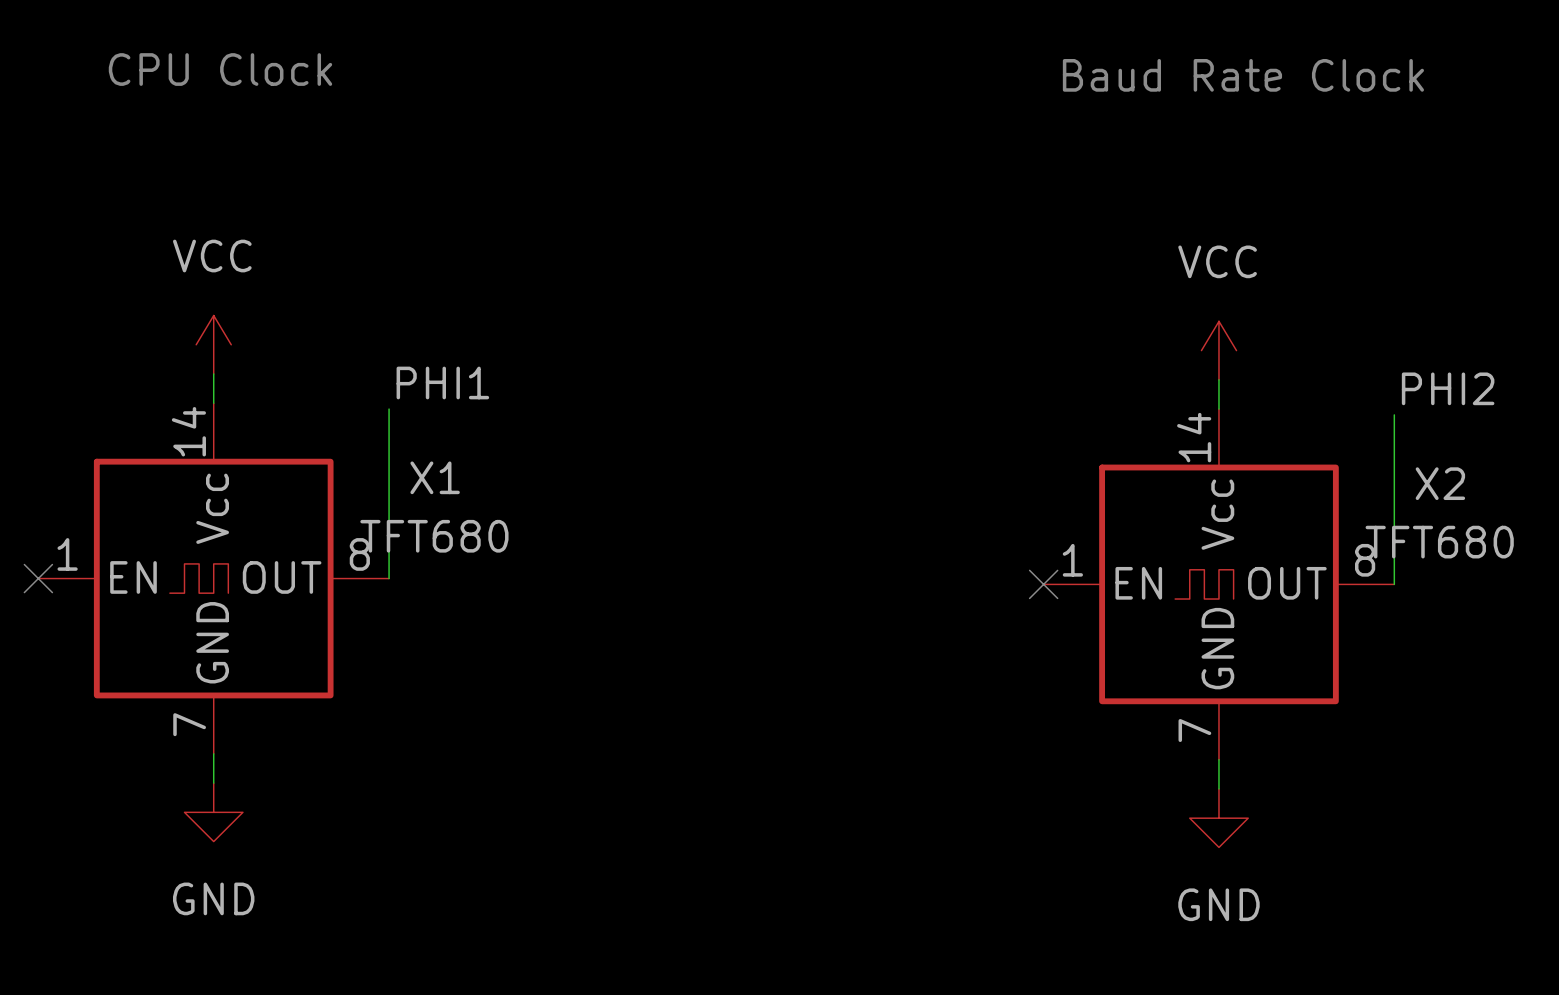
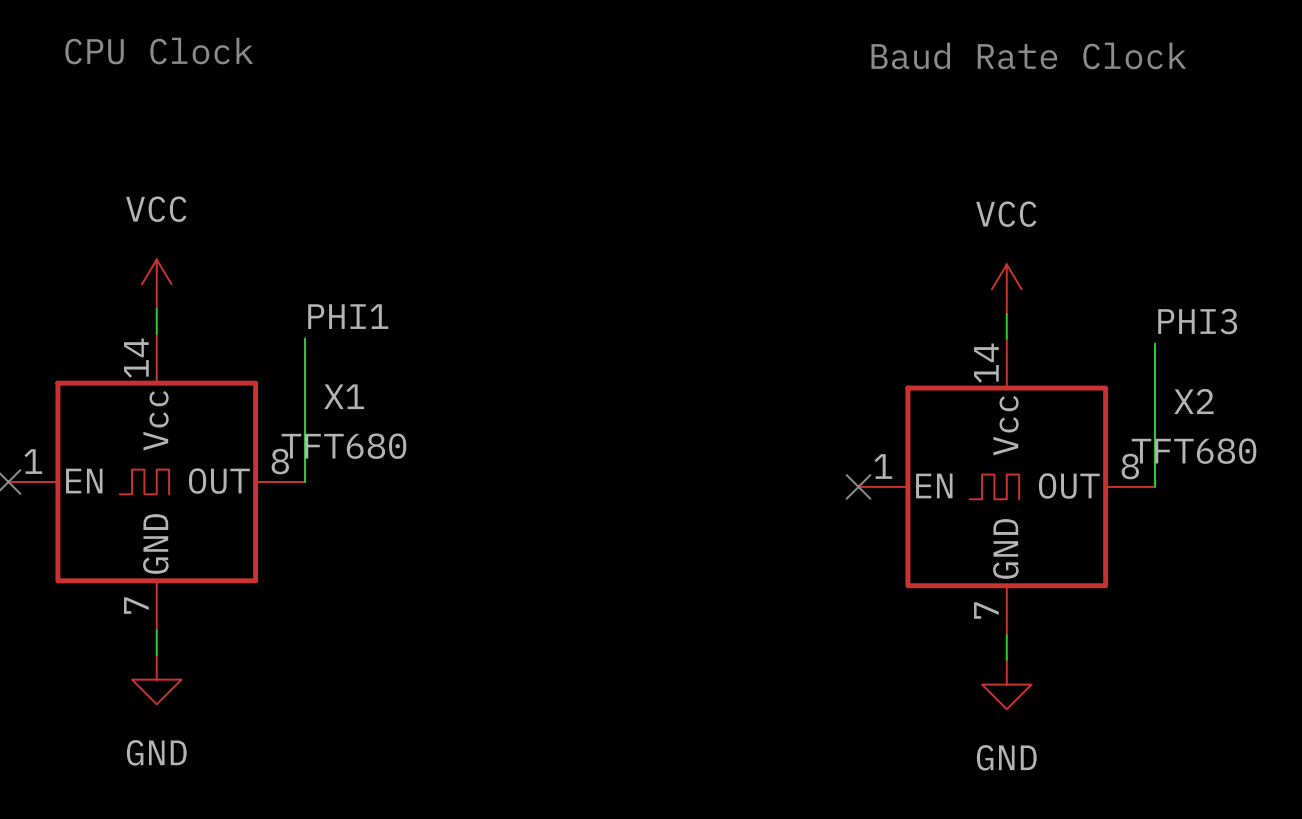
label: PHI2 (1448, 388) -> PHI3 (1197, 321)

